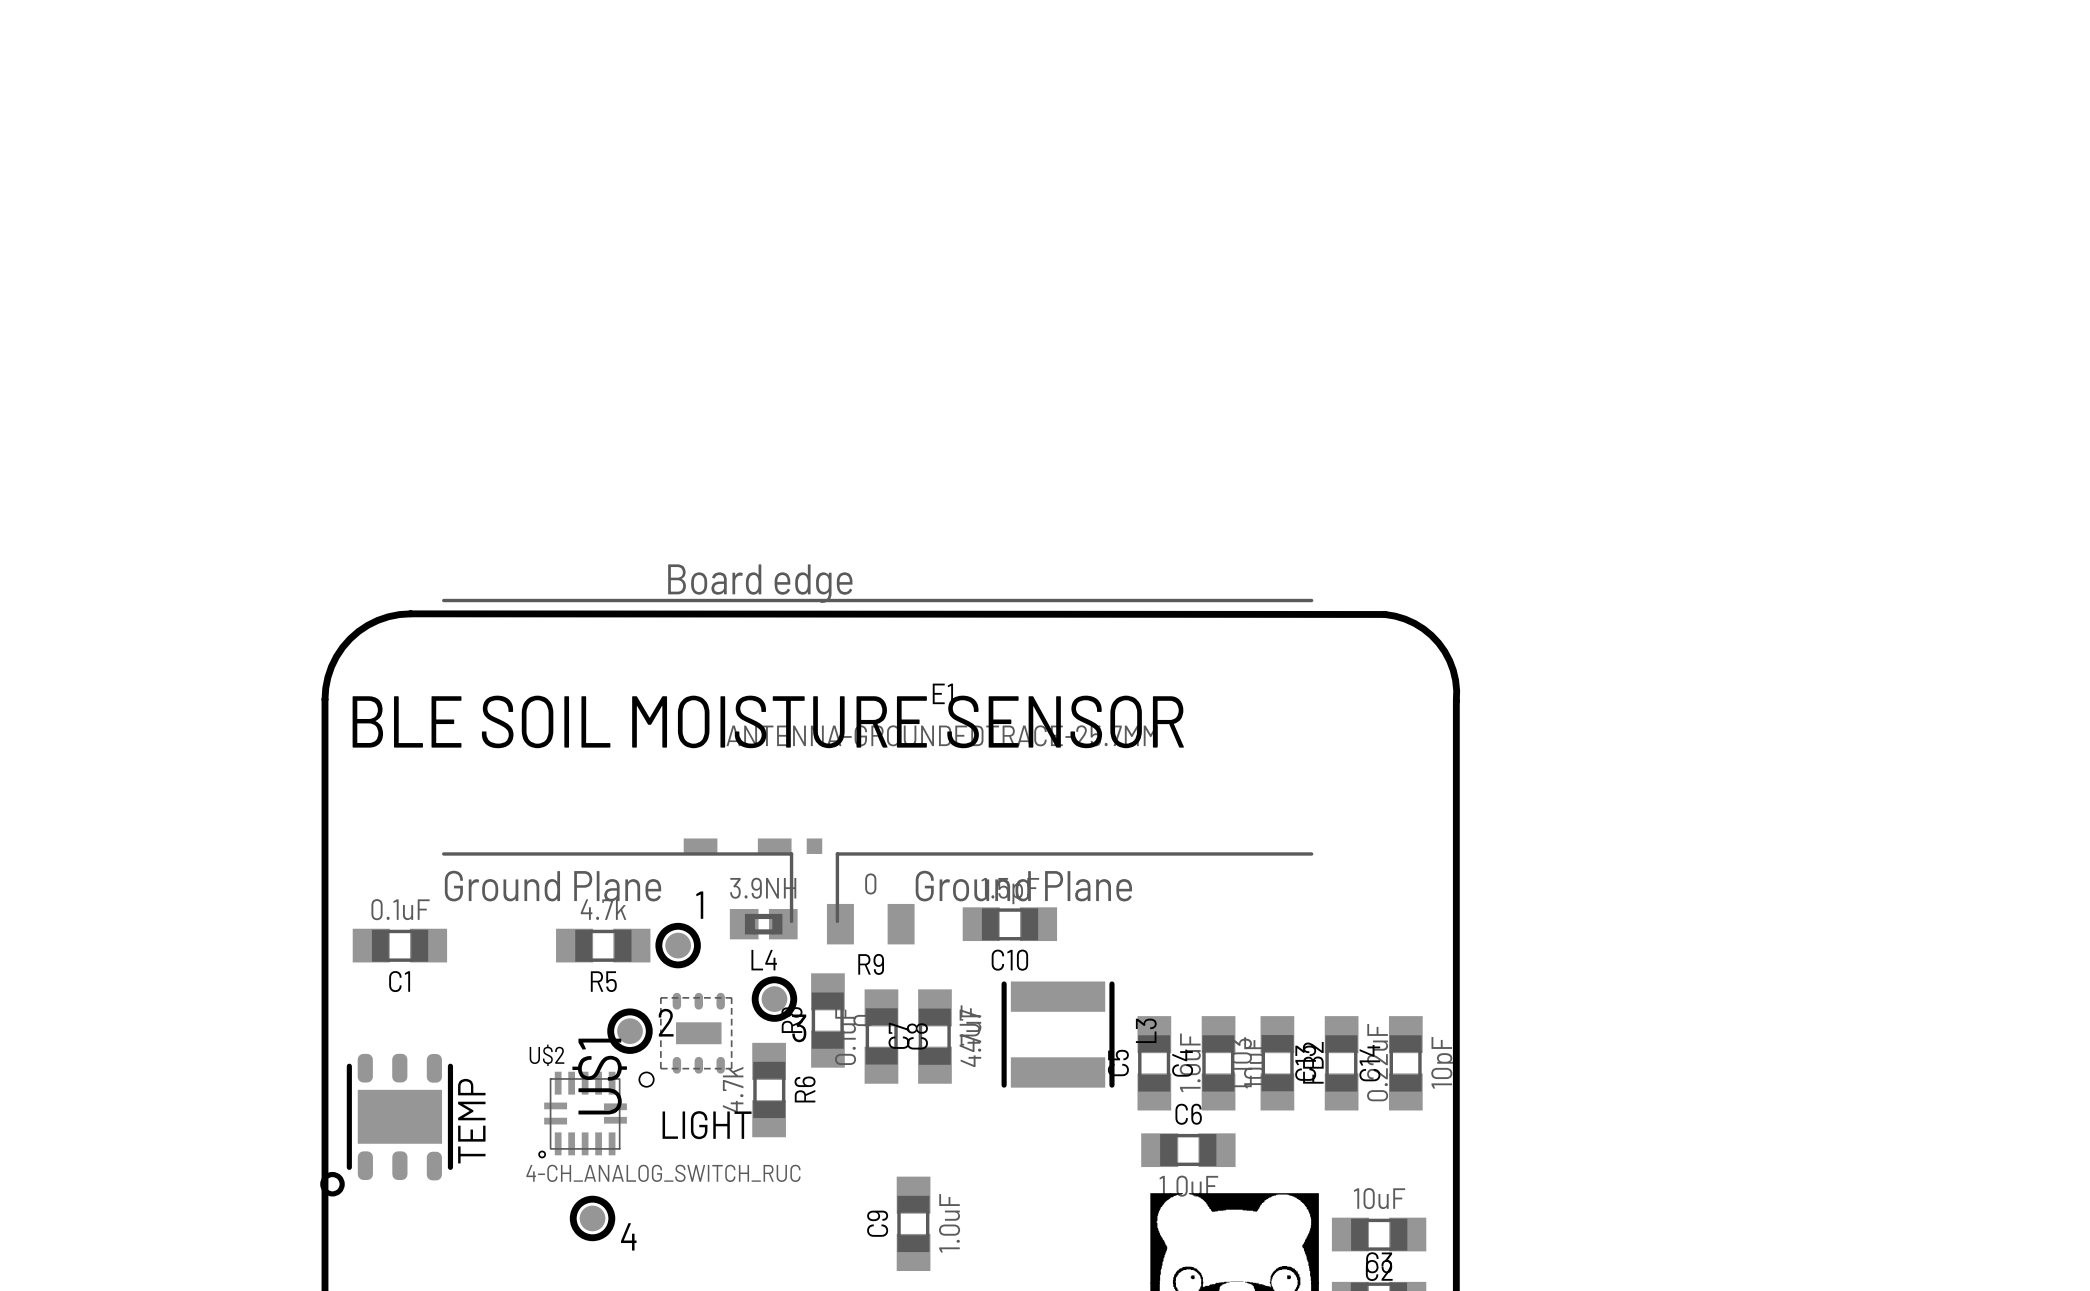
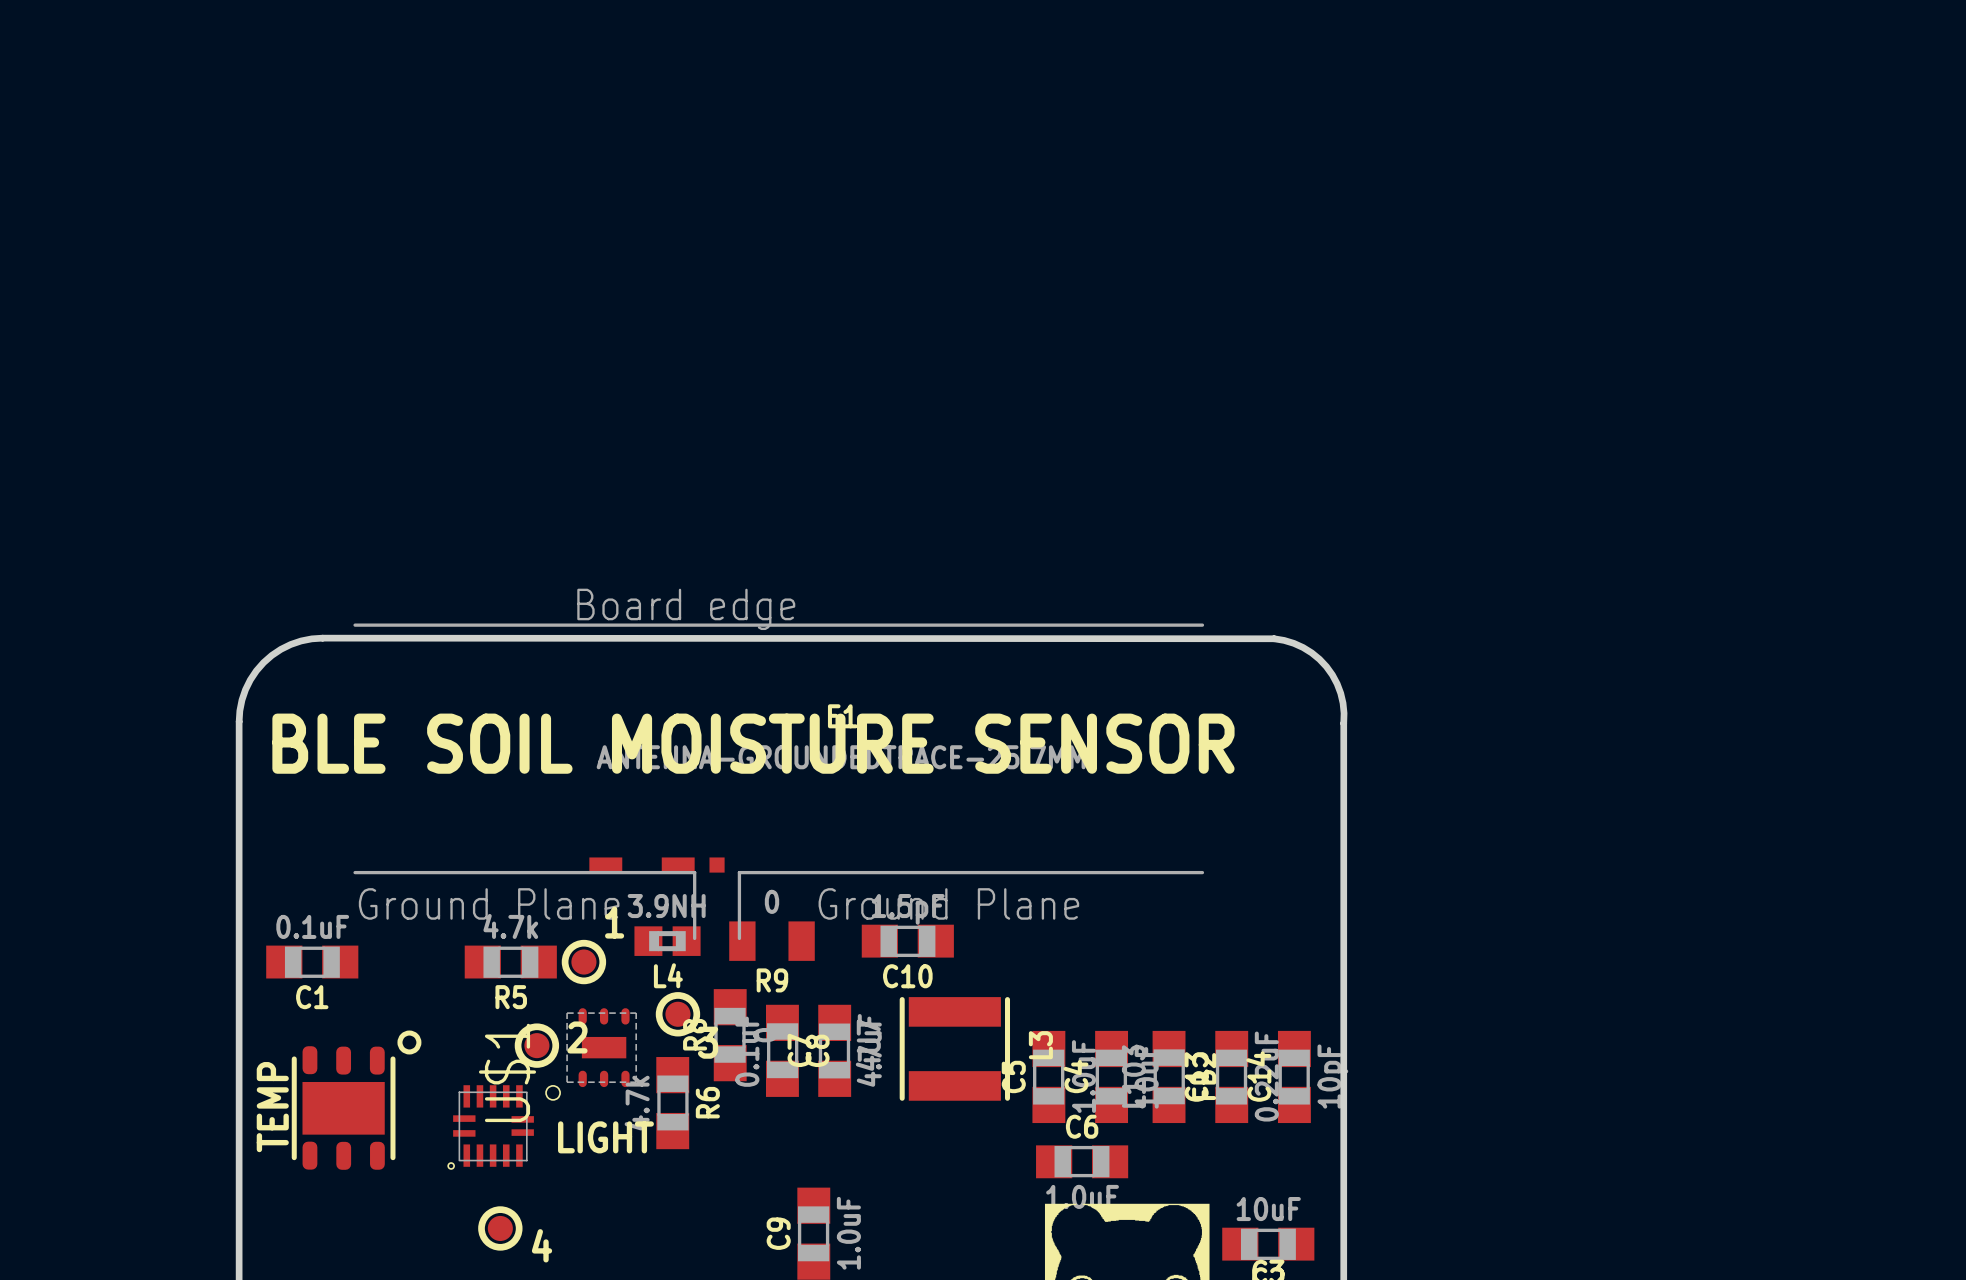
U$2 name: U$2 (547, 1055) -> none
text position: TEMP (471, 1121) -> TEMP (272, 1107)
part rotation: 0° (386, 1125) -> 180° (356, 1100)
U$2 value: 4-CH_ANALOG_SWITCH_RUC (663, 1173) -> none

